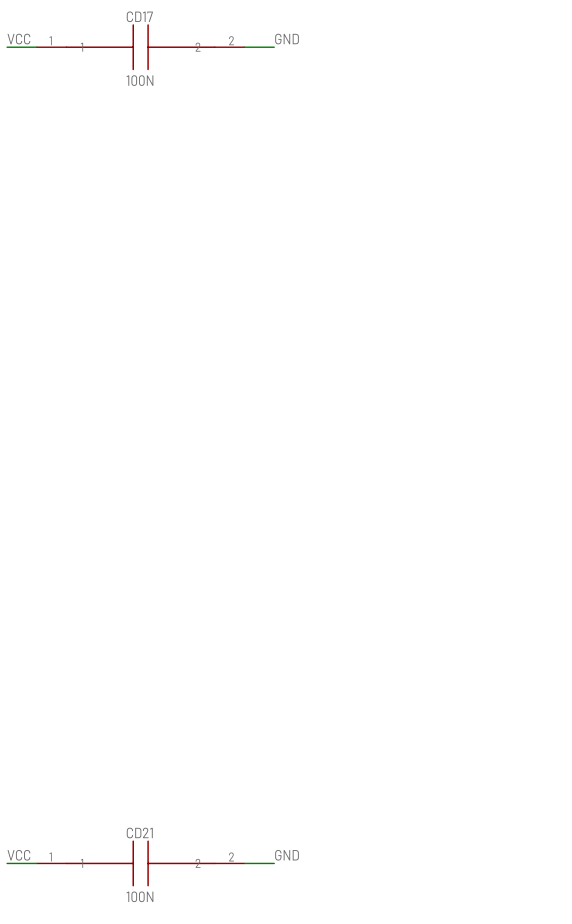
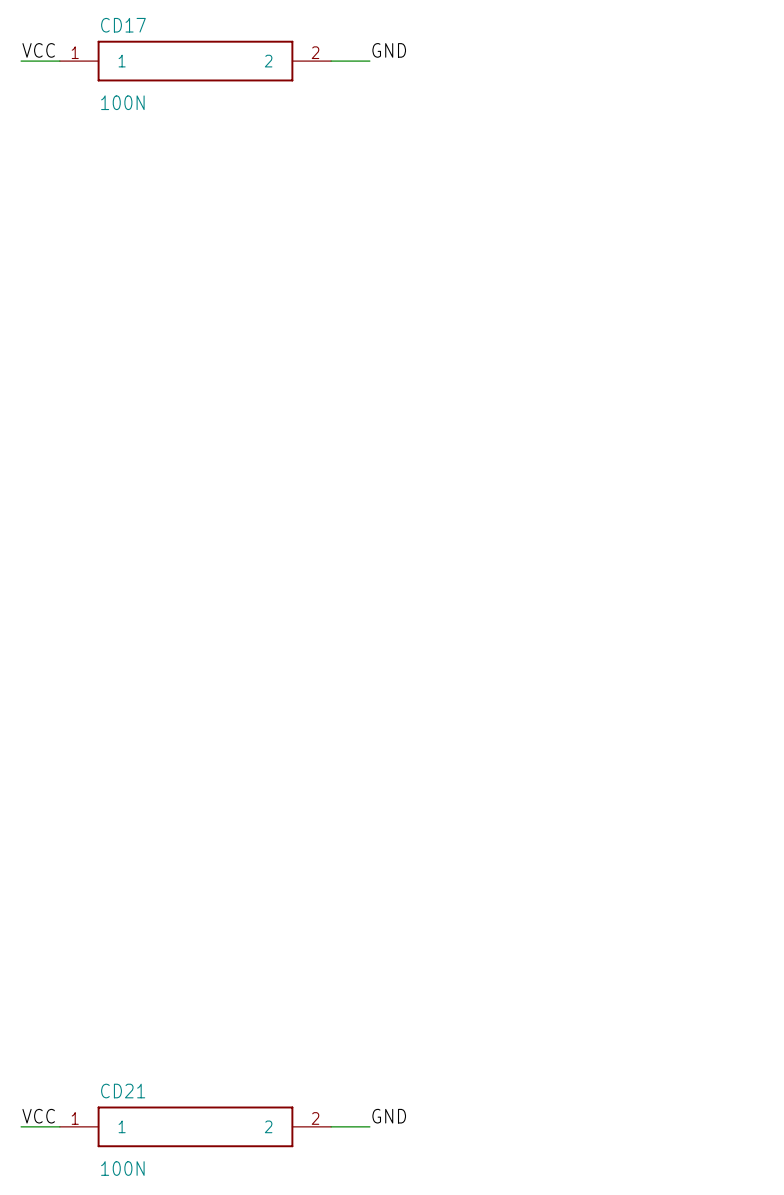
CD17 name position: CD17 (139, 16) -> CD17 (123, 25)
CD17 symbol: [36, 24, 245, 71] -> [59, 40, 332, 82]
CD17 value position: 100N (139, 80) -> 100N (122, 102)
CD21 name position: CD21 (139, 833) -> CD21 (123, 1091)
CD21 symbol: [36, 840, 245, 887] -> [59, 1106, 332, 1148]
CD21 value position: 100N (139, 896) -> 100N (122, 1168)

